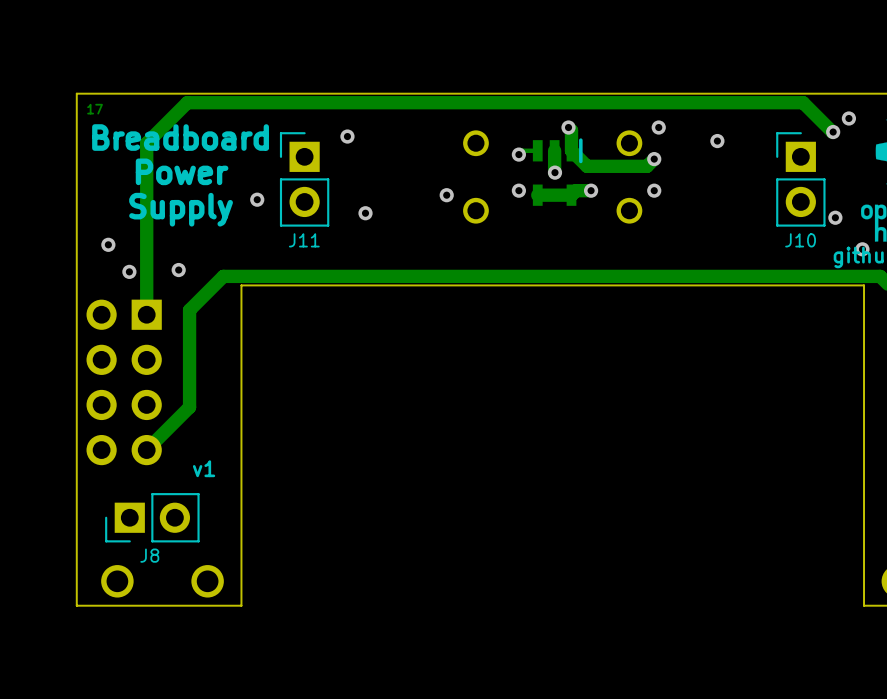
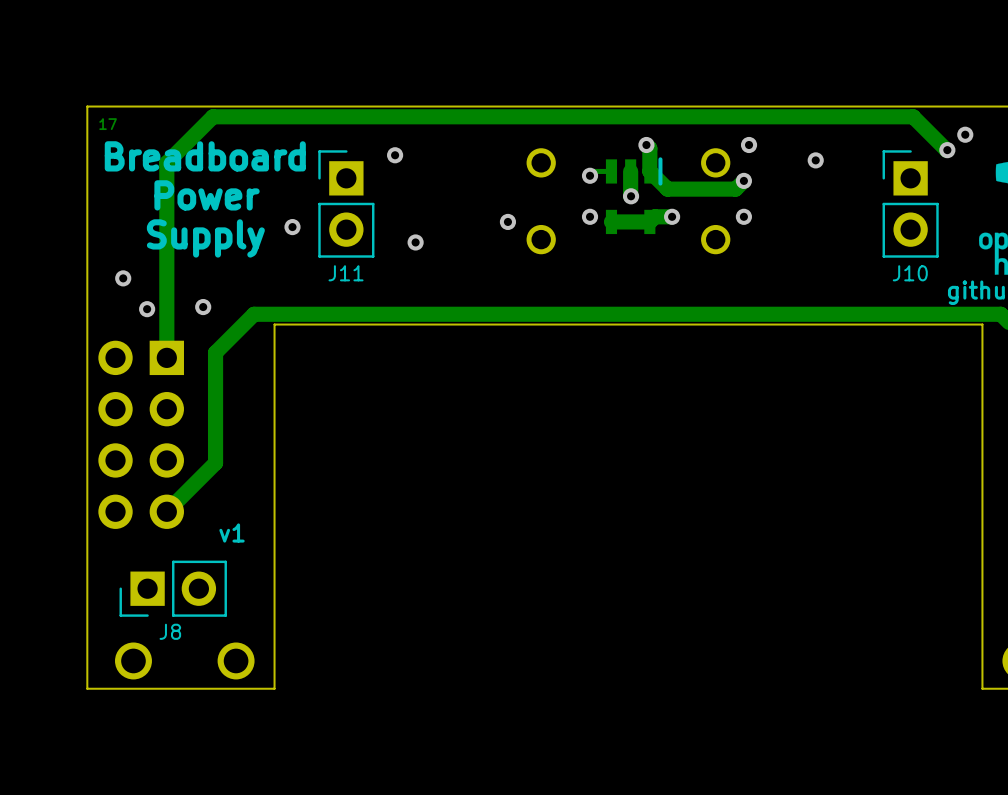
via: (835, 217) -> none
via: (862, 249) -> none

